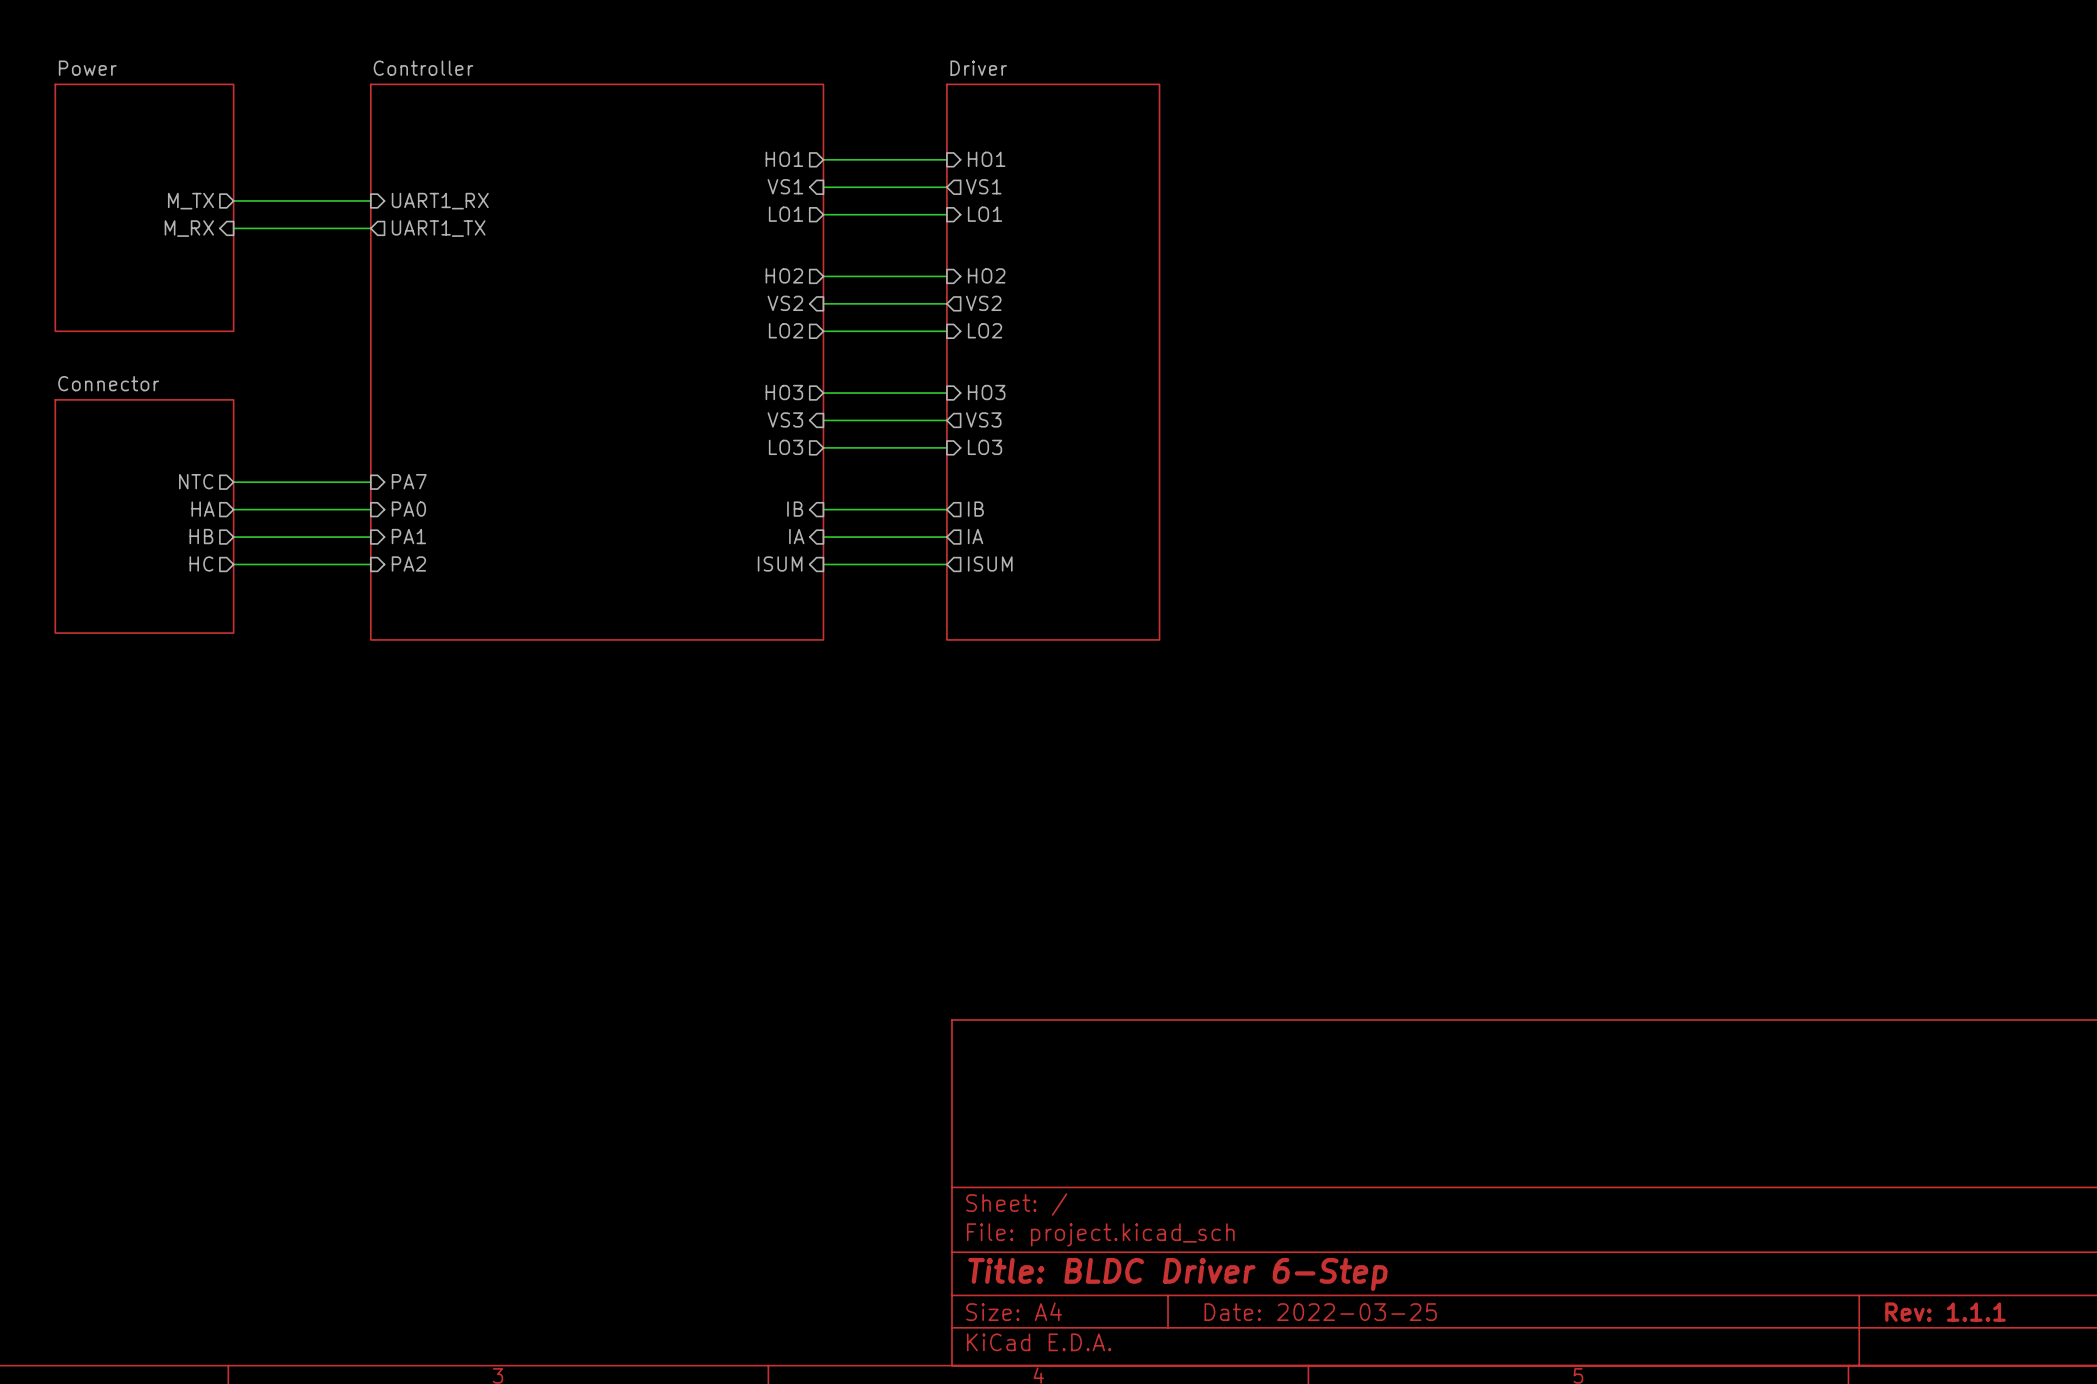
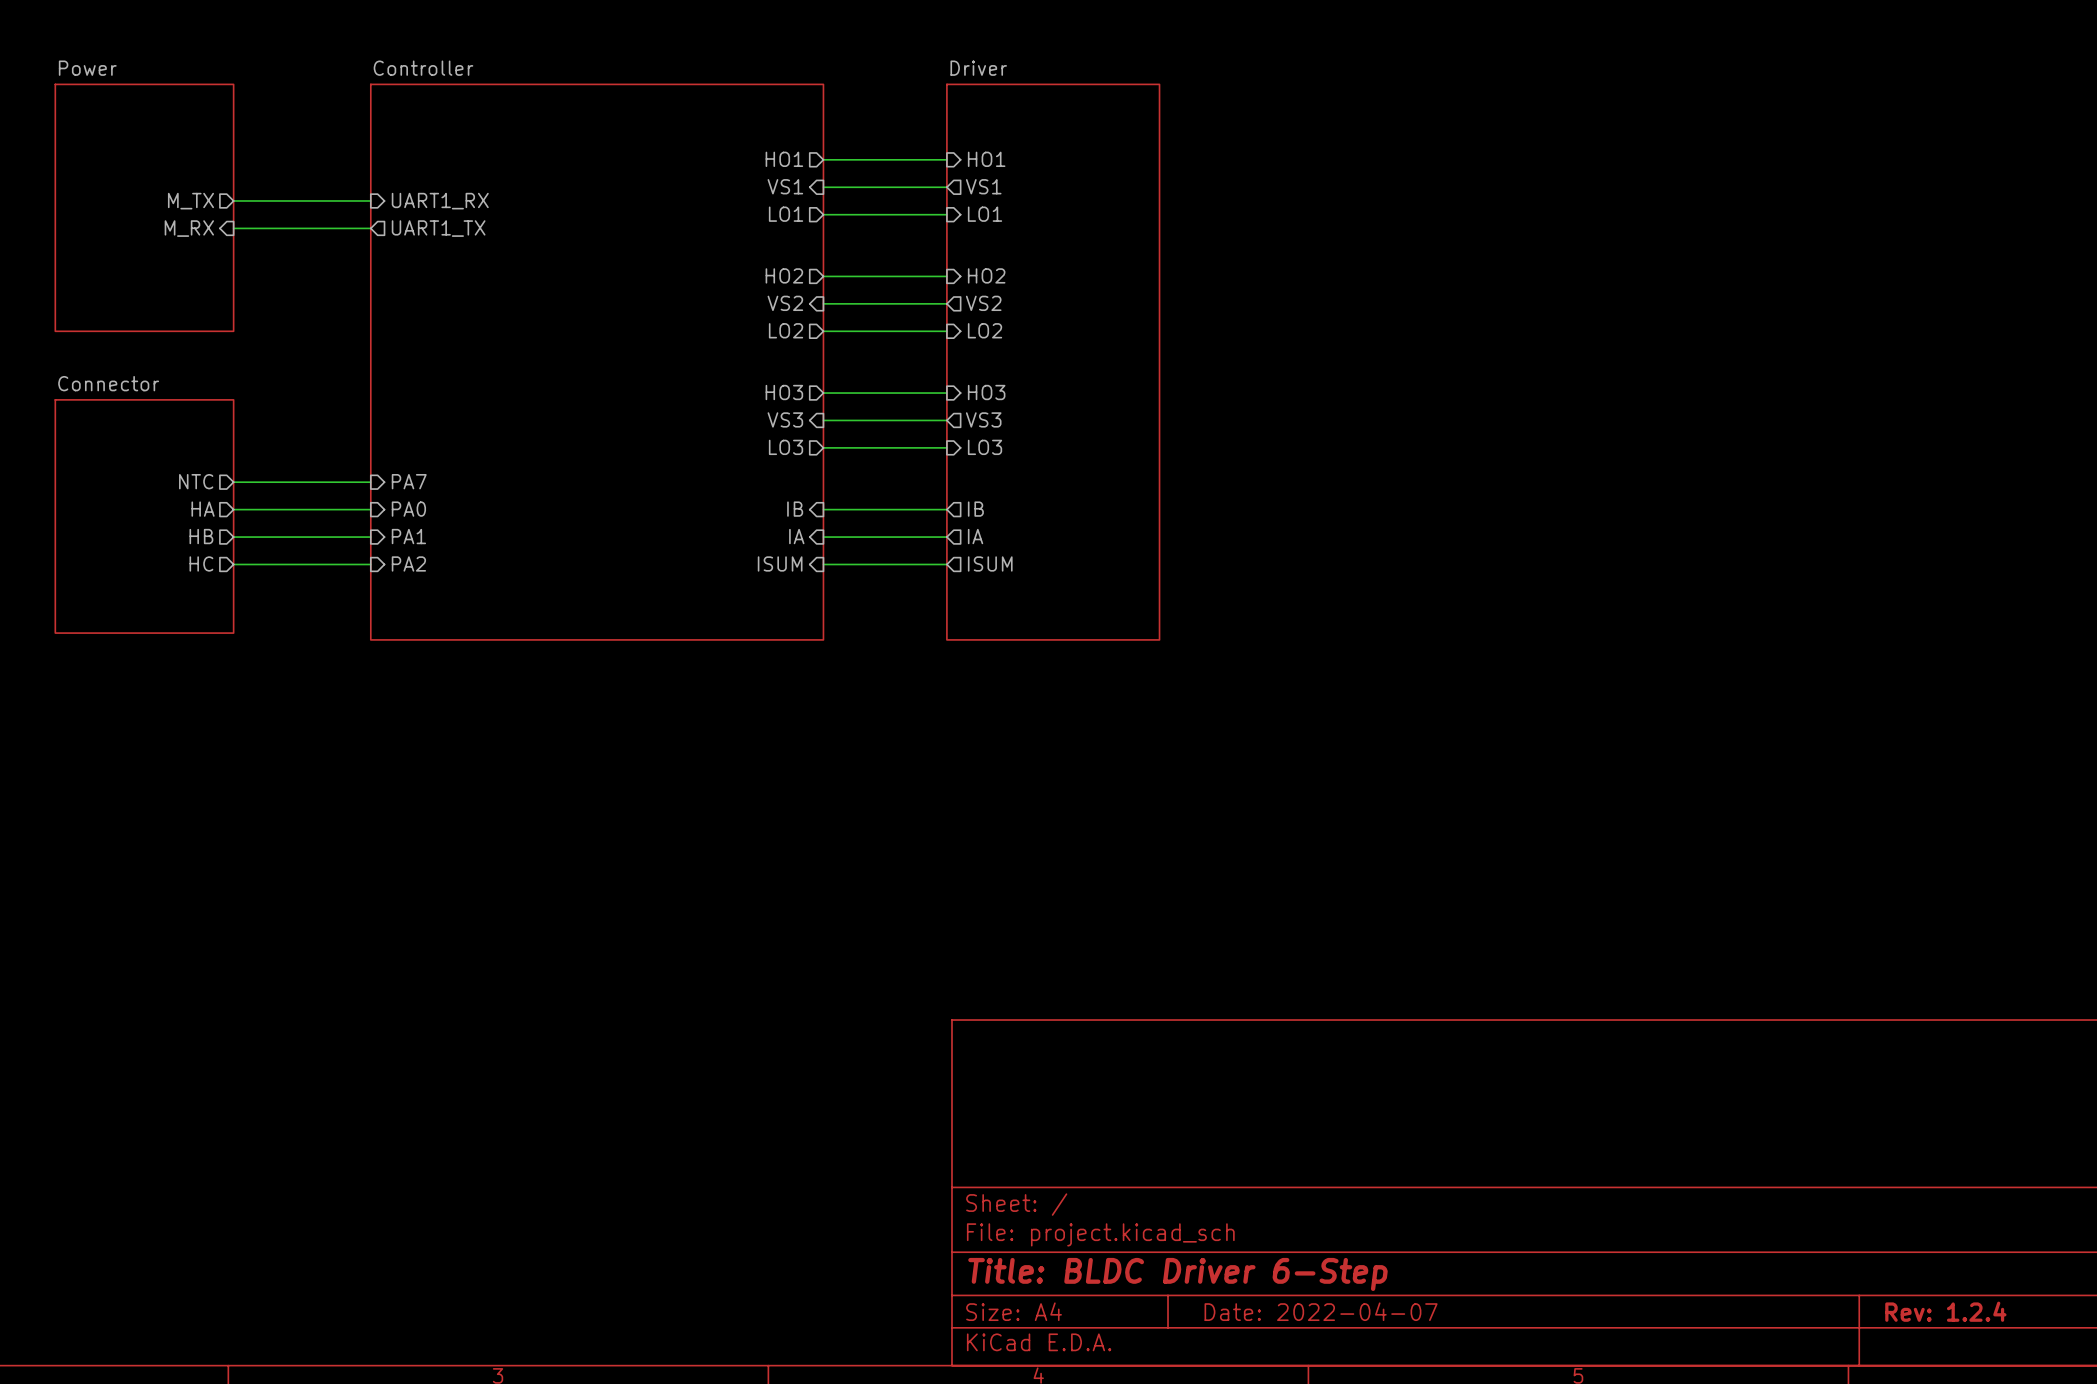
title block: Date: 2022-03-25 (1320, 1312) -> Date: 2022-04-07 (1321, 1311)
title block: Rev: 1.1.1 (1945, 1312) -> Rev: 1.2.4 (1945, 1311)

